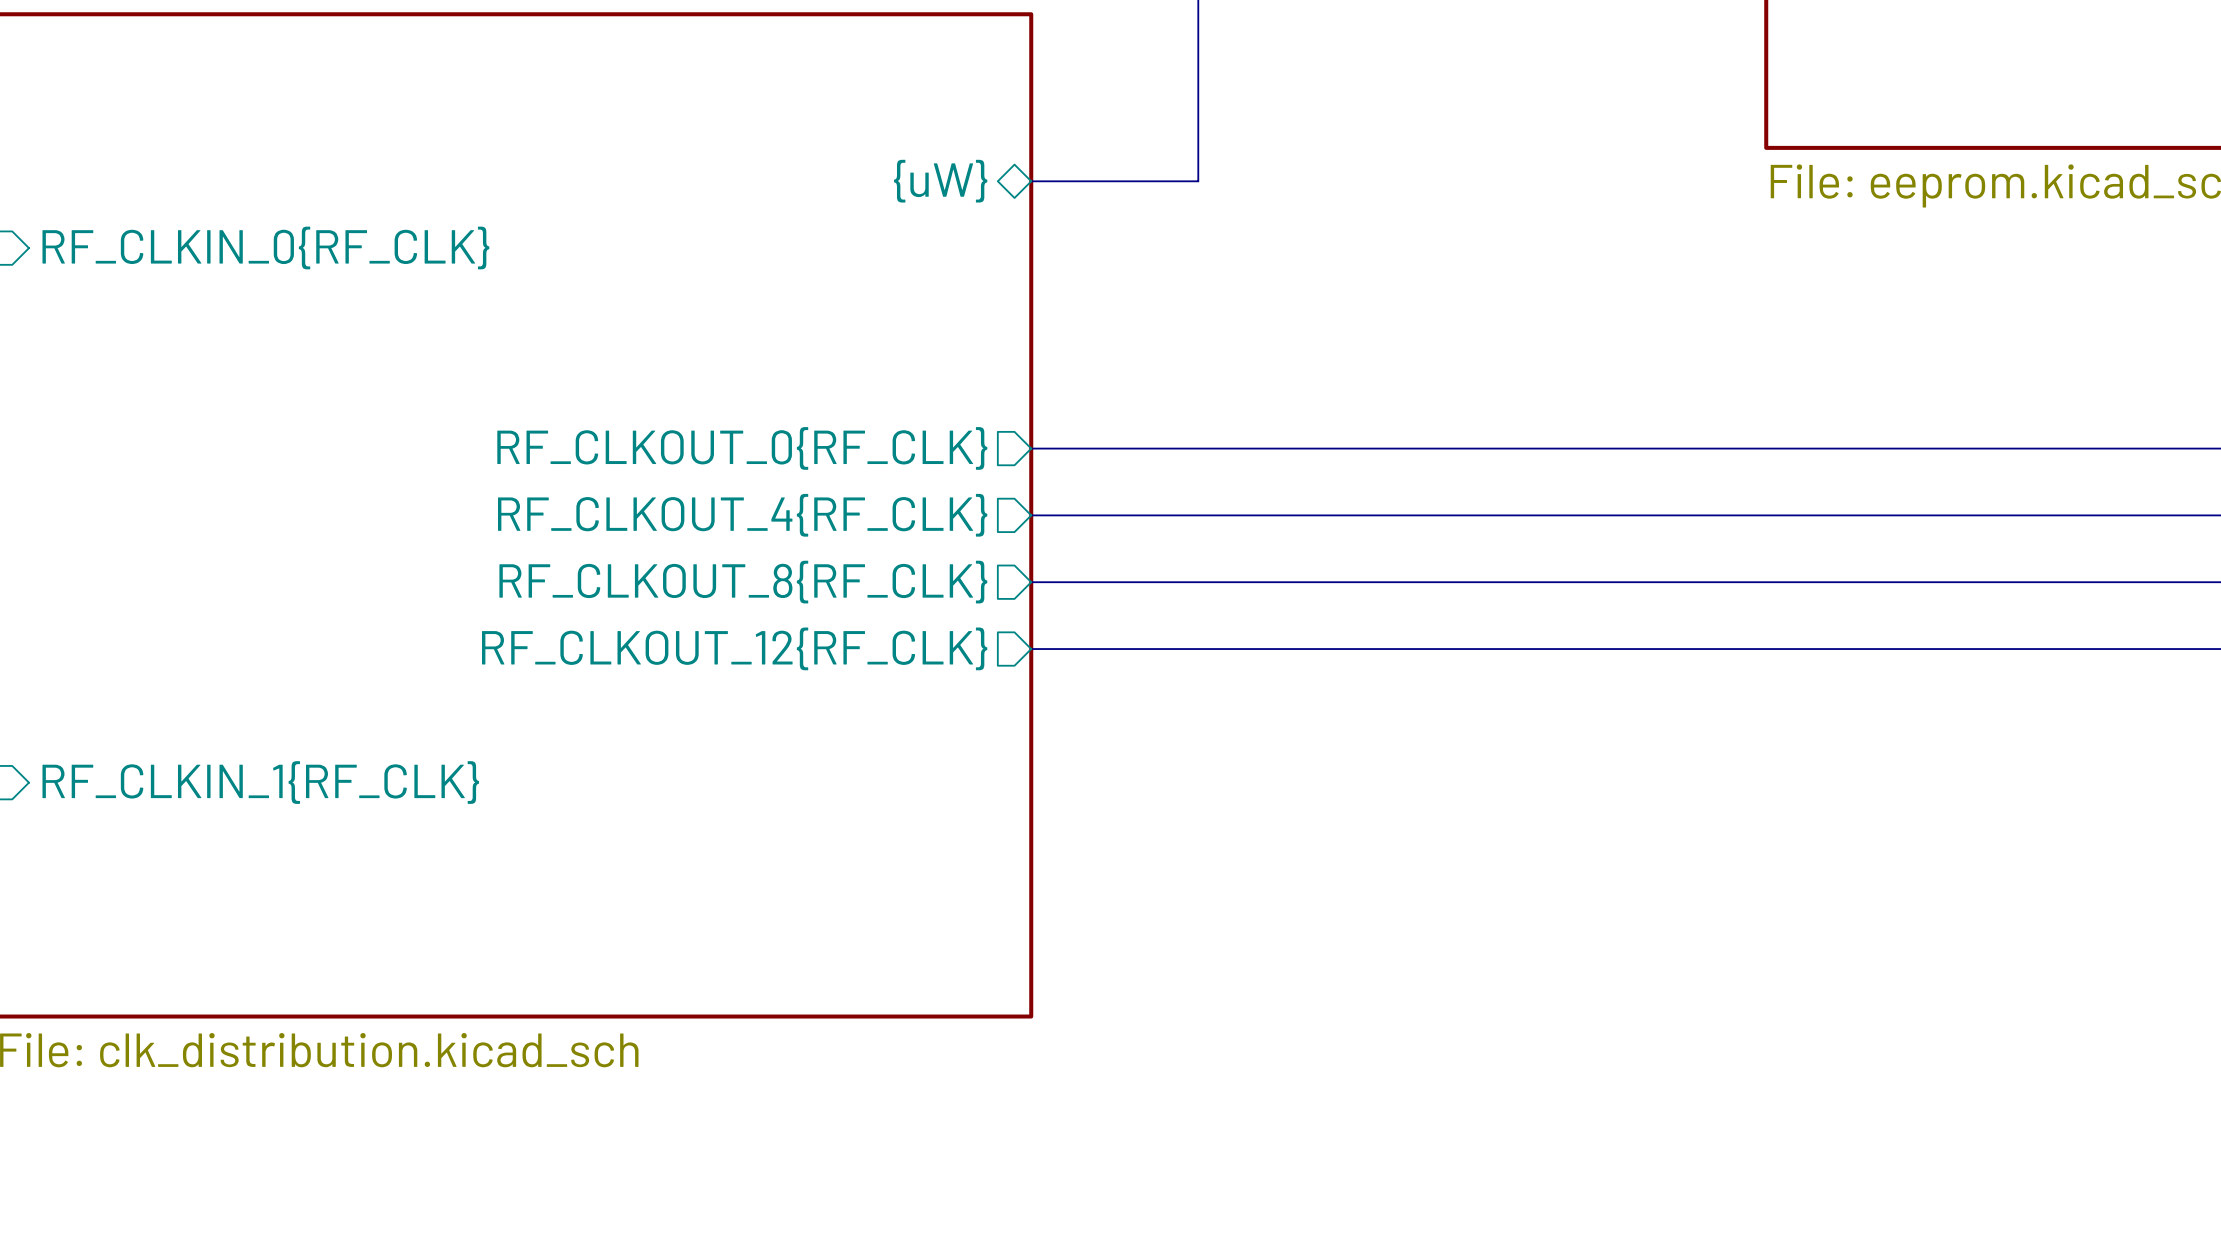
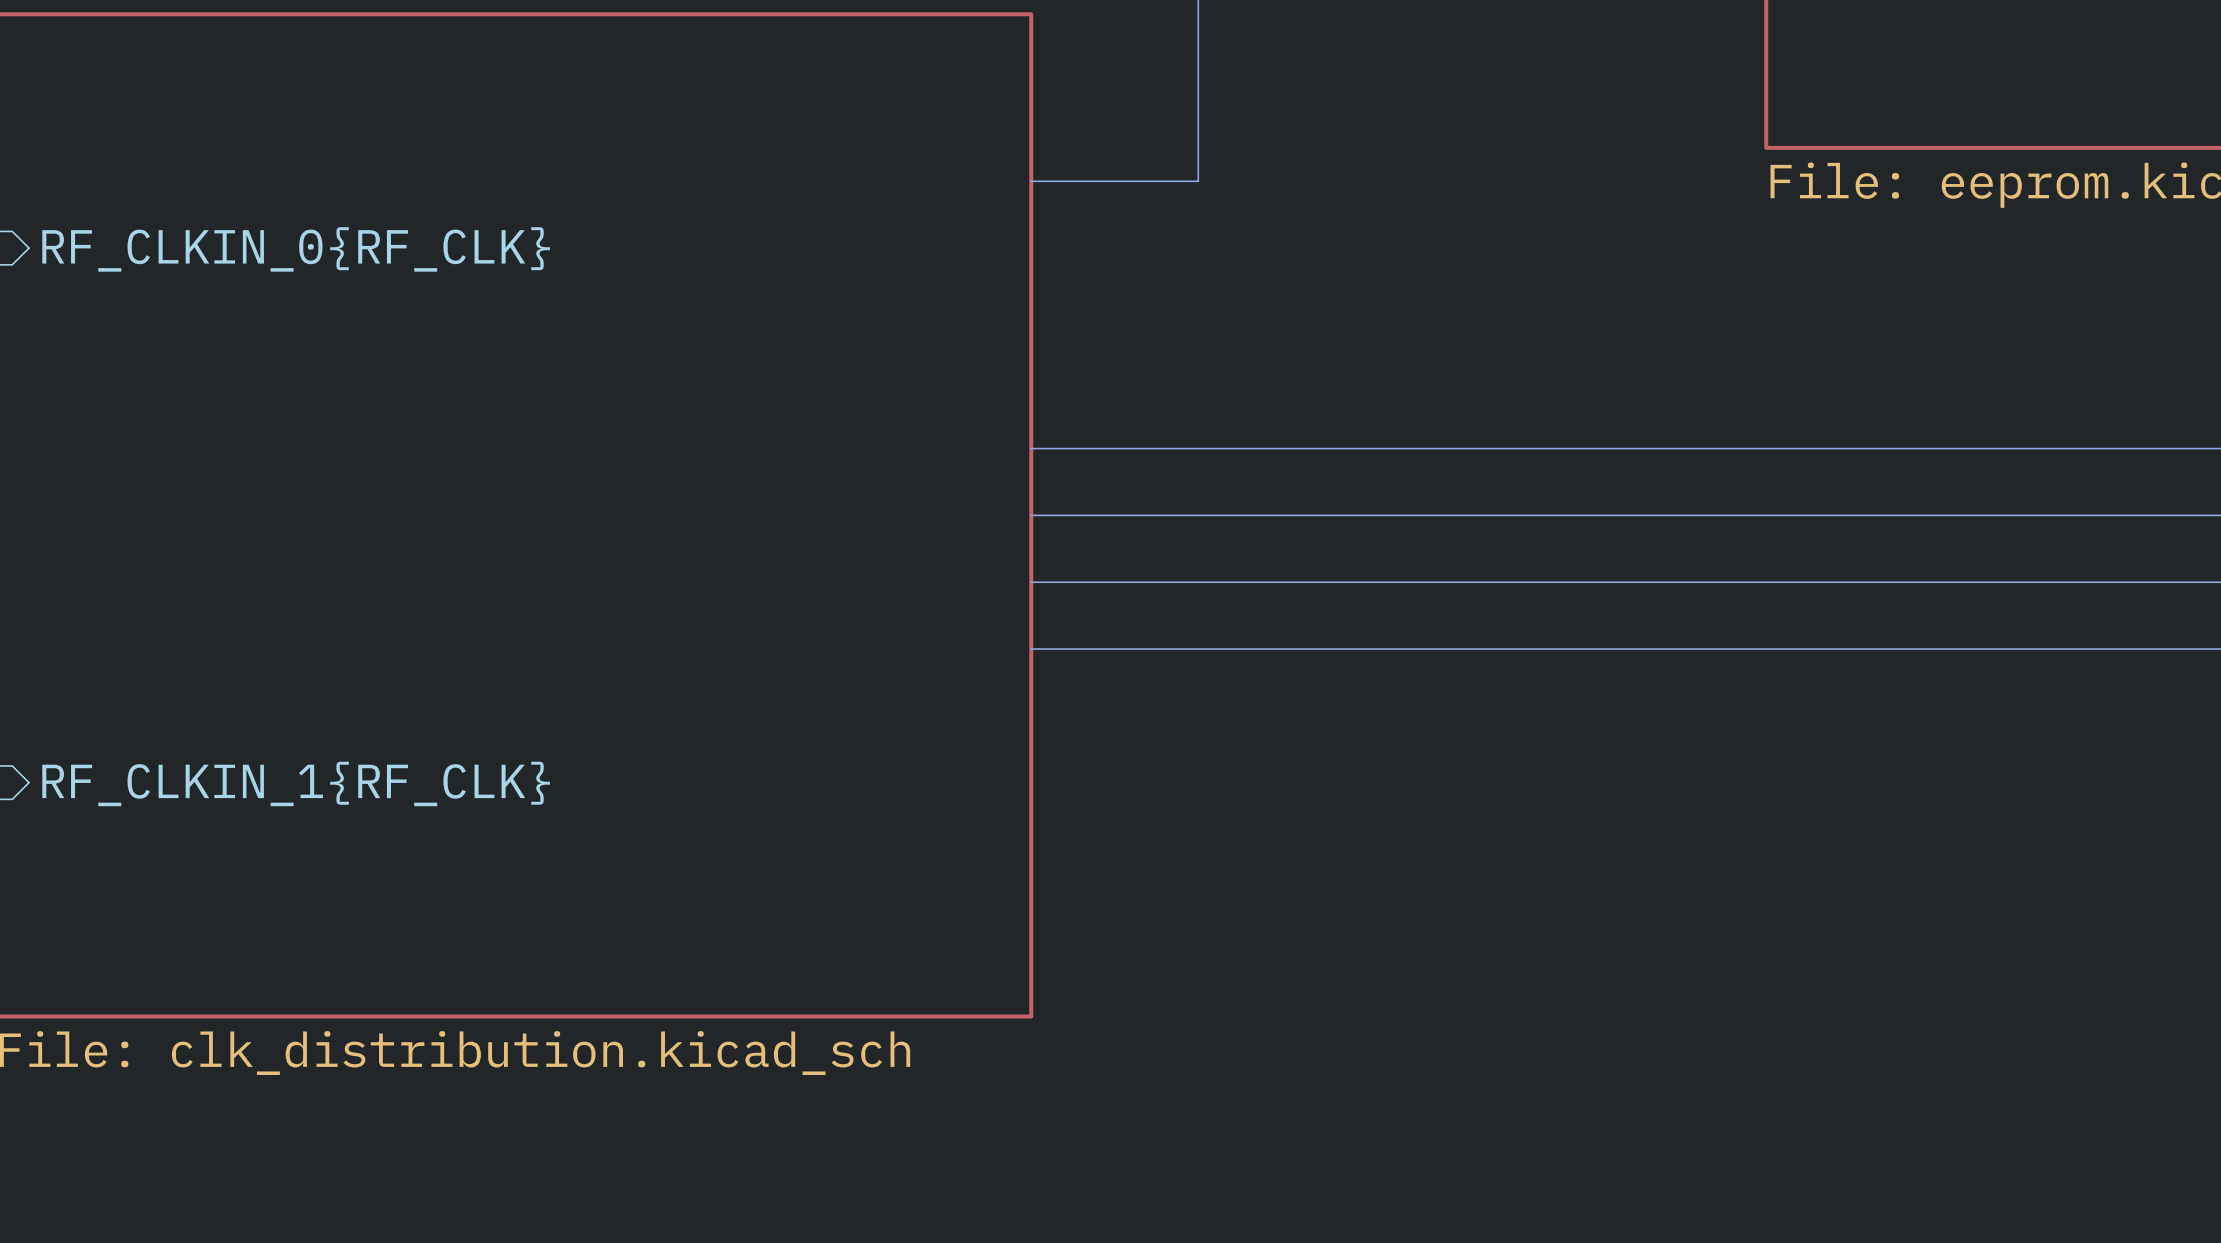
sheet pin: {uW} (940, 181) -> none
sheet pin: RF_CLKOUT_0{RF_CLK} (742, 448) -> none
sheet pin: RF_CLKOUT_4{RF_CLK} (742, 515) -> none
sheet pin: RF_CLKOUT_8{RF_CLK} (743, 582) -> none
sheet pin: RF_CLKOUT_12{RF_CLK} (734, 648) -> none

